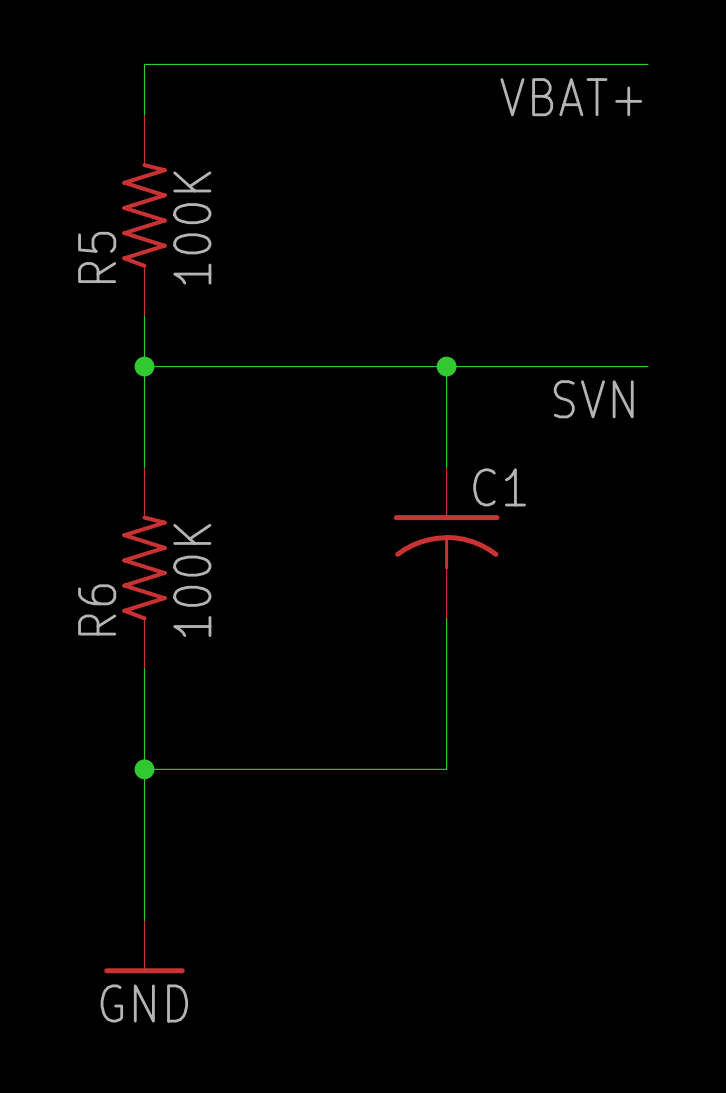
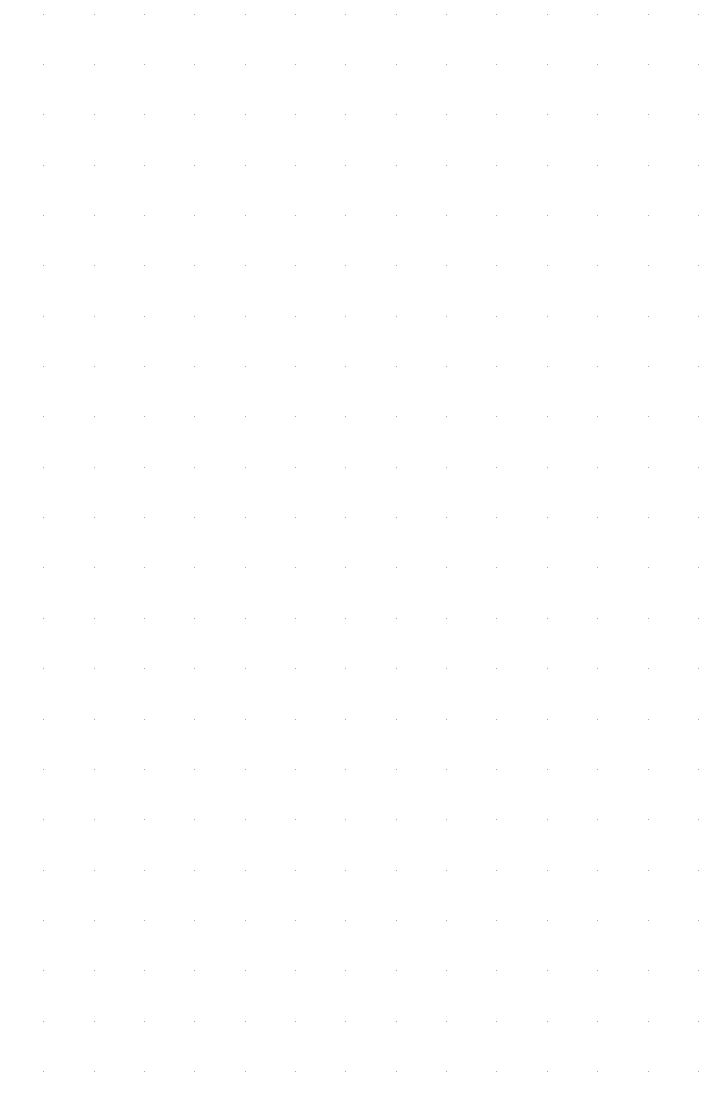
wire: (648, 64) (144, 64) (144, 114) -> none
label: VBAT+ (571, 97) -> none
R5: 100K (144, 215) -> none
wire: (144, 316) (144, 467) -> none
wire: (144, 366) (648, 366) -> none
junction: (144, 366) -> none
wire: (446, 366) (446, 467) -> none
junction: (446, 366) -> none
label: SVN (593, 399) -> none
C1: (446, 542) -> none
R6: 100K (144, 567) -> none
wire: (446, 618) (446, 769) (144, 769) -> none
wire: (144, 668) (144, 920) -> none
junction: (144, 769) -> none
power symbol: GND (144, 946) -> none

